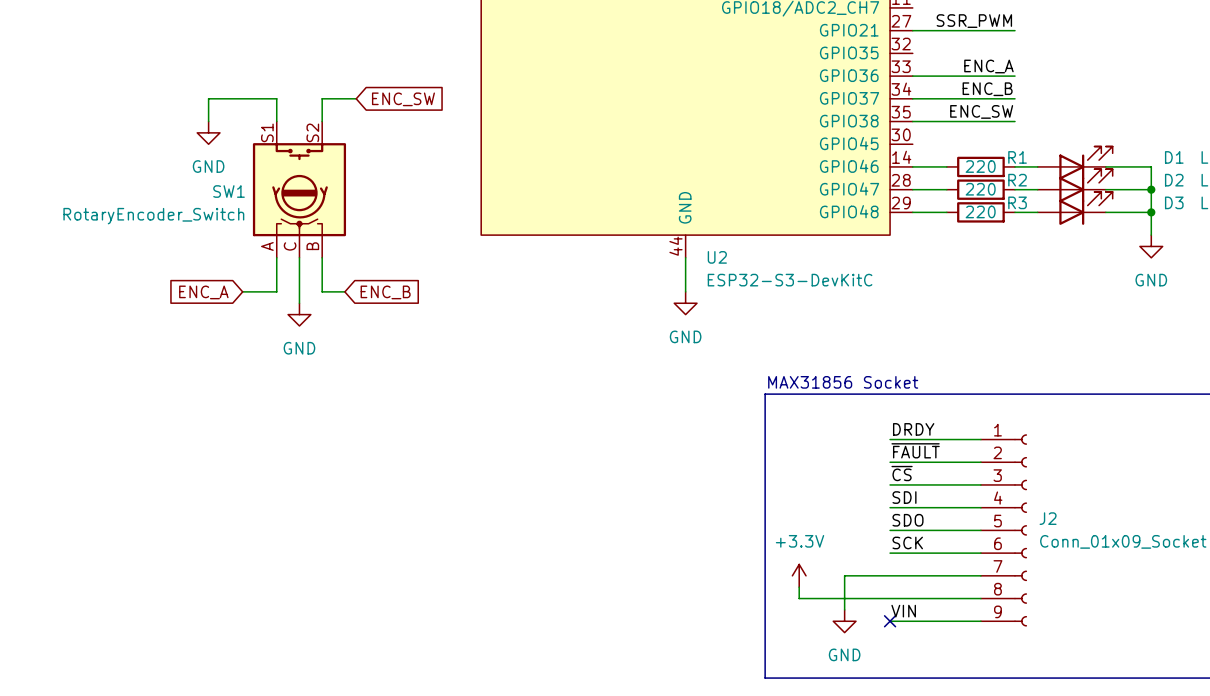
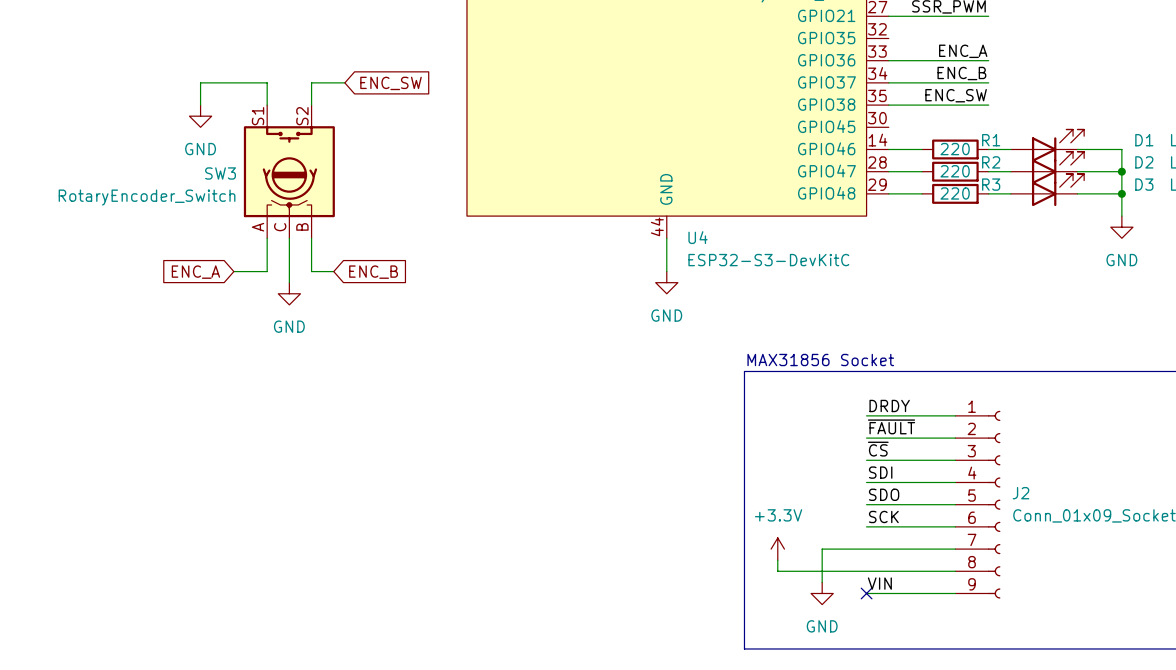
SW1 name: SW1 (229, 191) -> SW3 (220, 173)
U2 name: U2 (717, 257) -> U4 (698, 237)

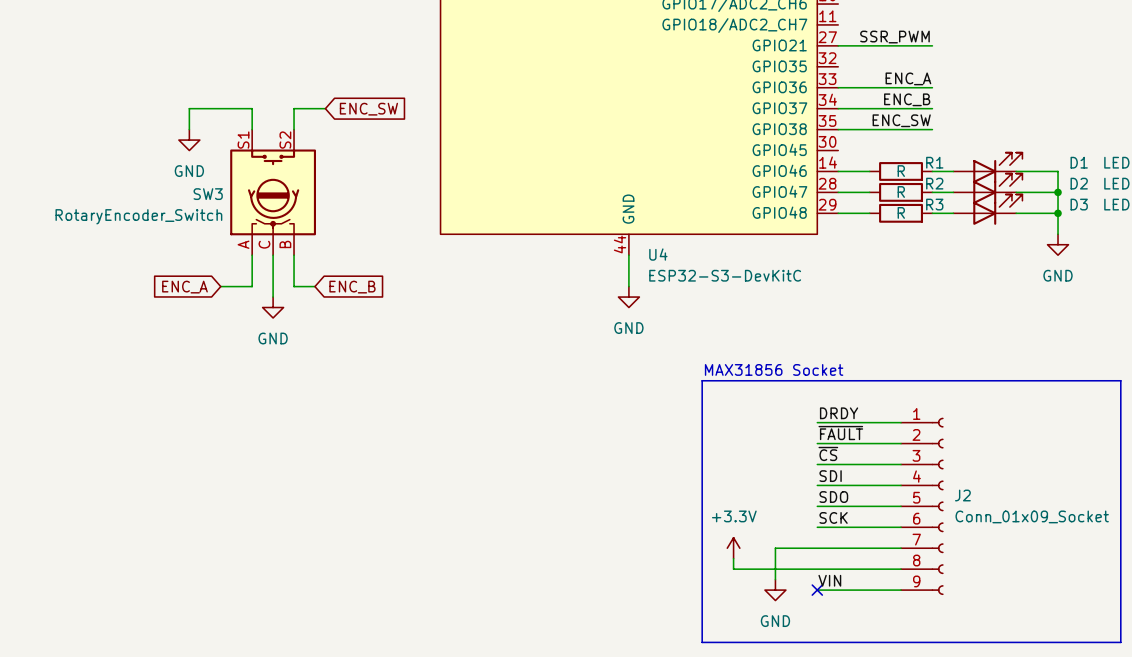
R1 value: 220 (955, 149) -> R (901, 171)
R2 value: 220 (955, 171) -> R (901, 192)
R3 value: 220 (955, 193) -> R (901, 212)

